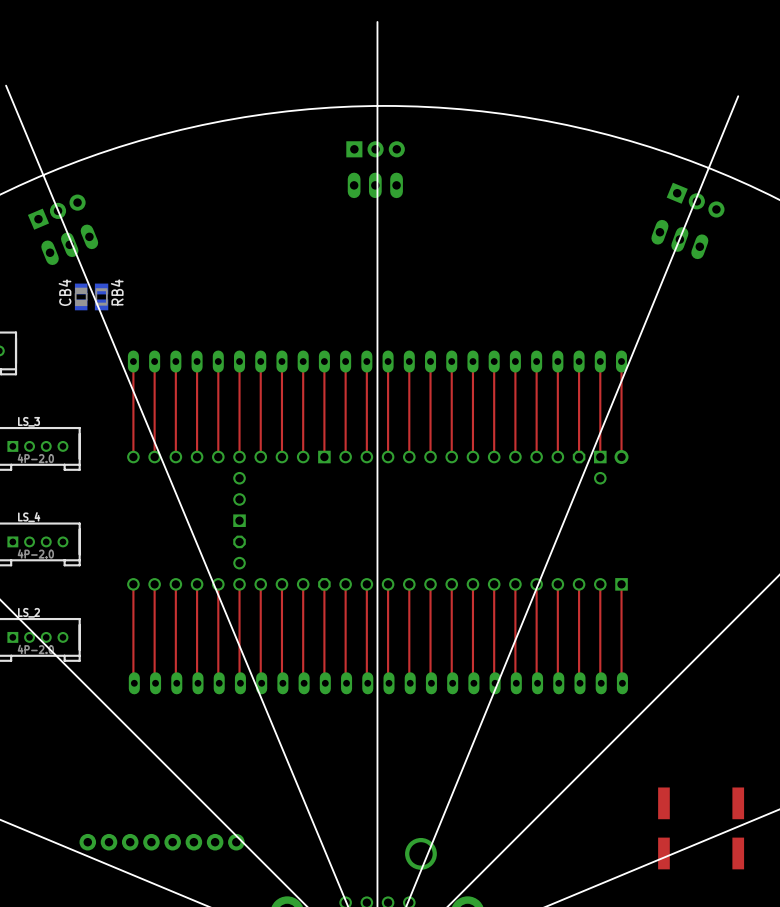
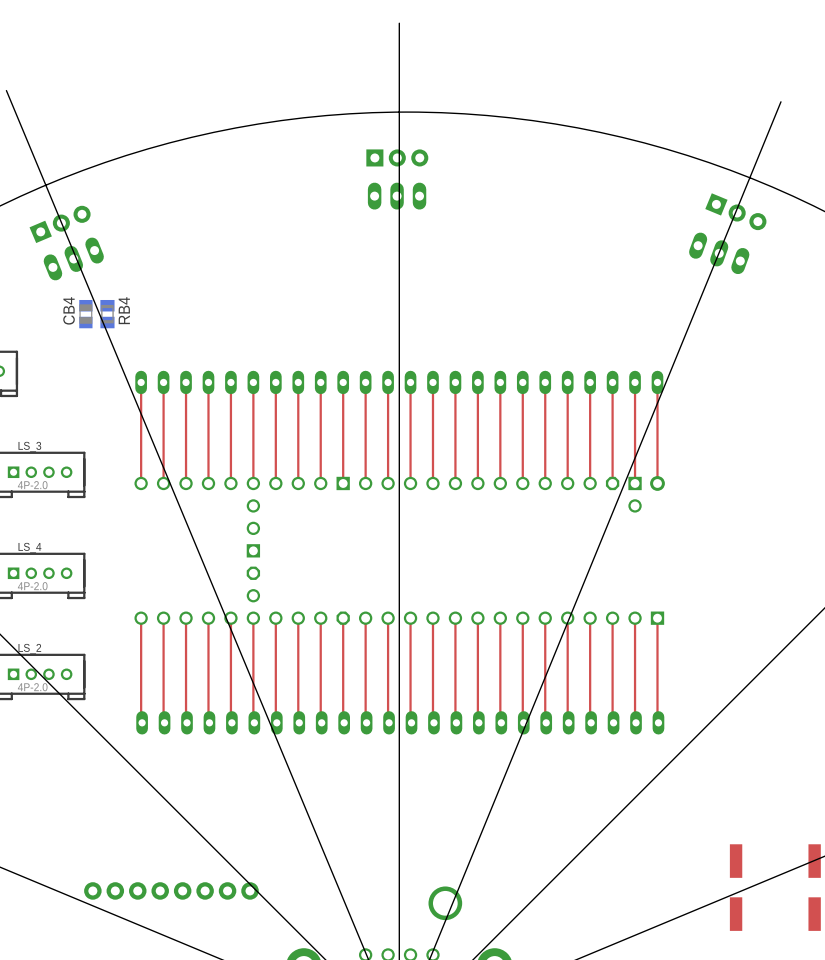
part: (663, 828) -> none
part: (738, 828) -> none
part: none -> (736, 887)
part: none -> (814, 887)

